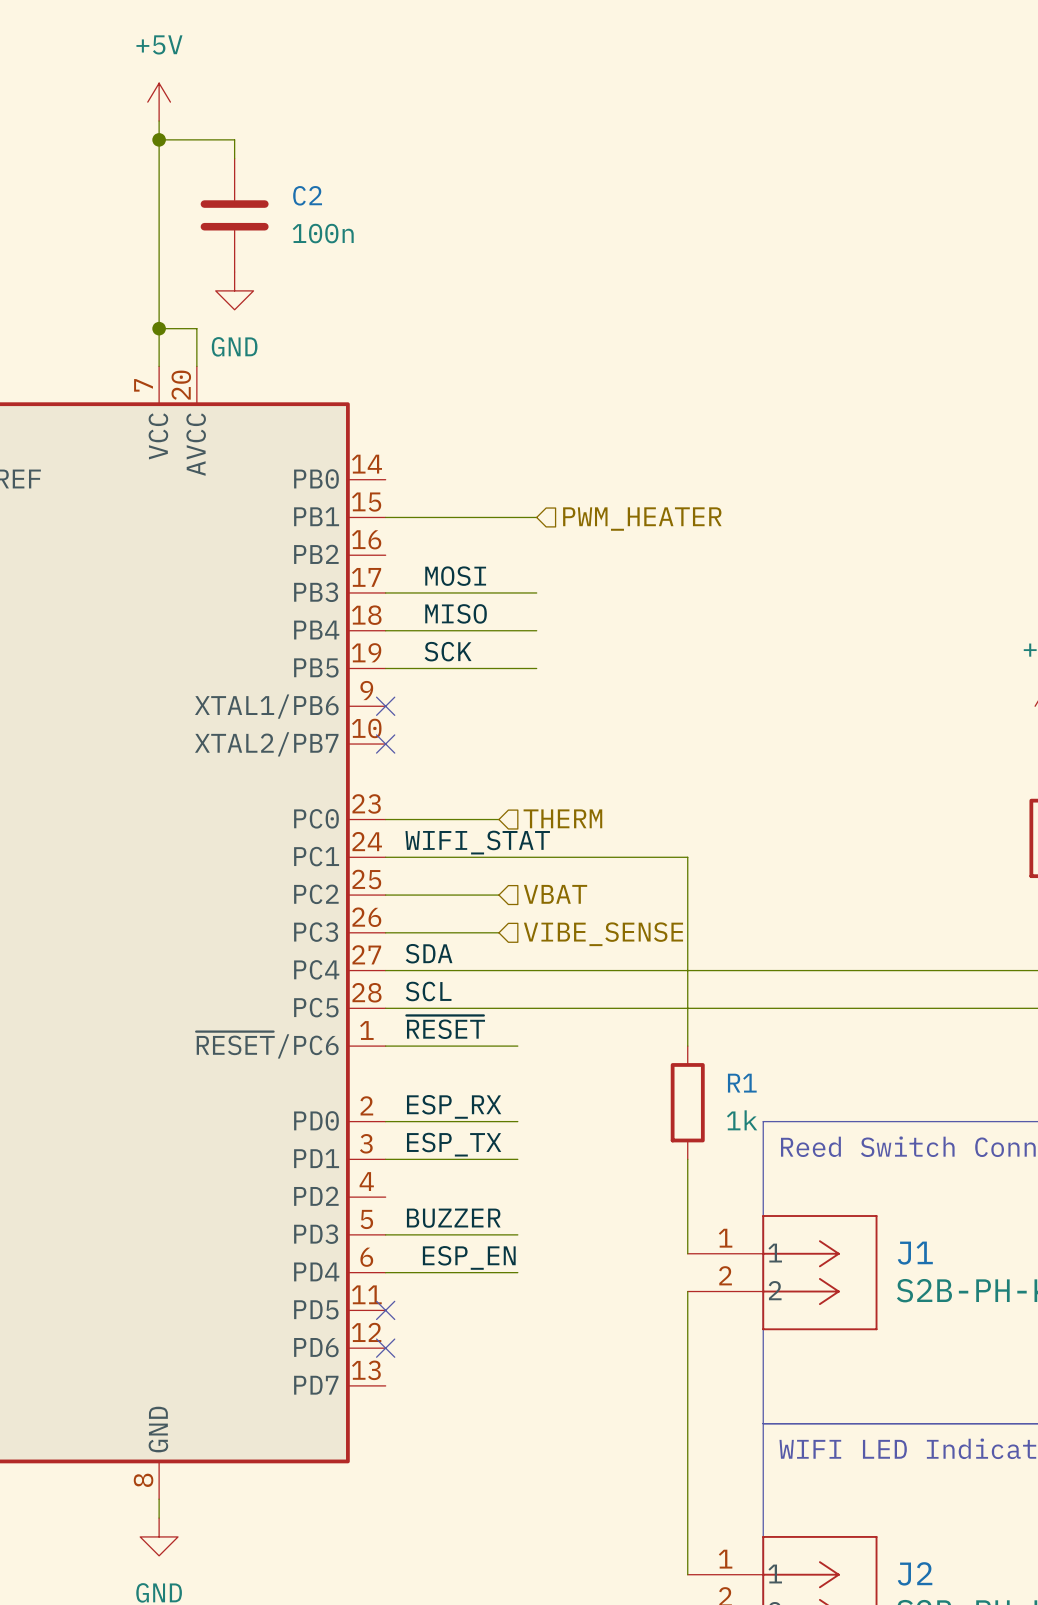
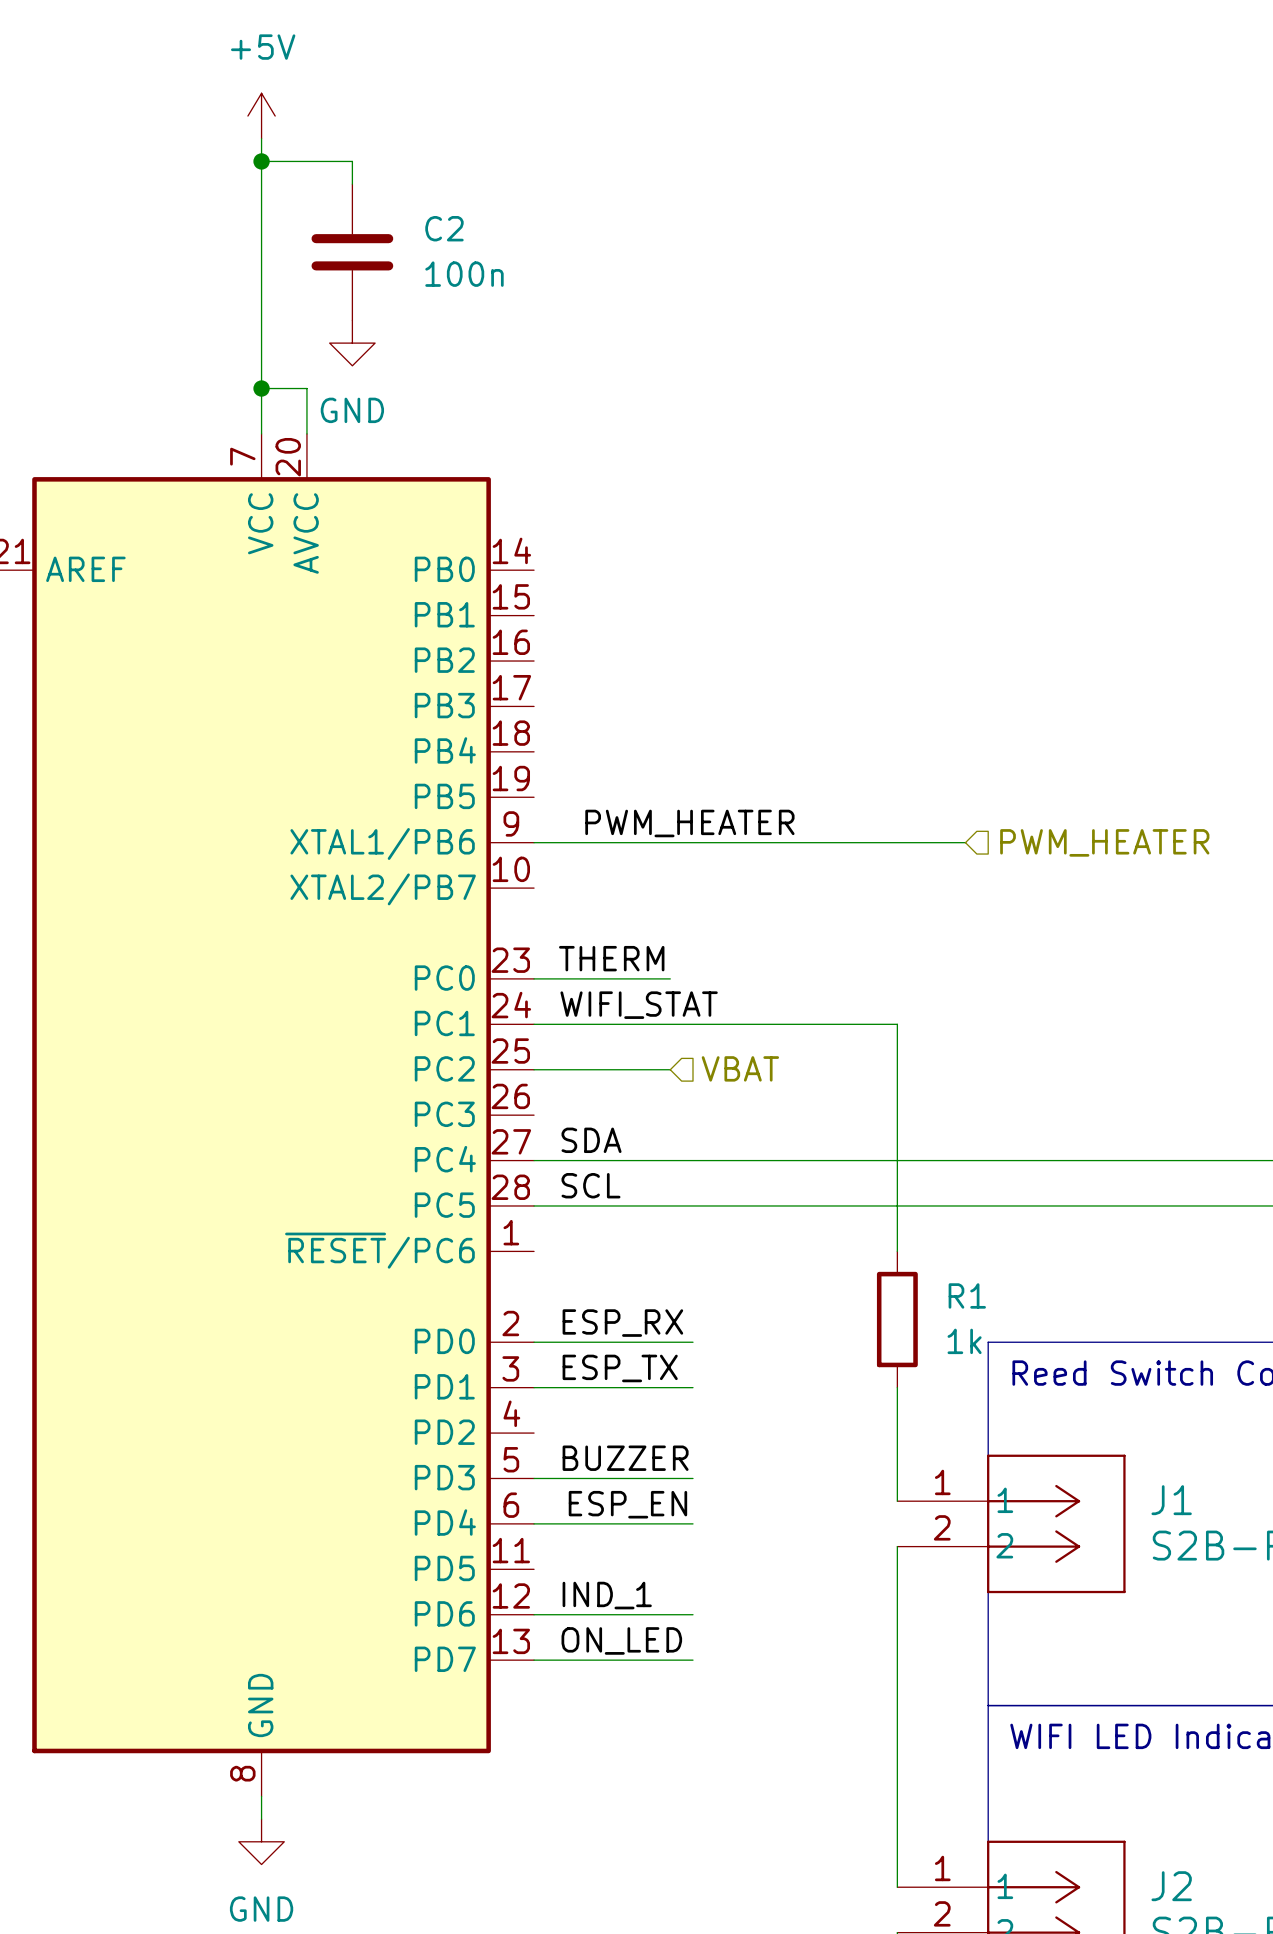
wire: (385, 517) (536, 517) -> none
hierarchical label position: PWM_HEATER (642, 519) -> PWM_HEATER (1104, 842)
label: MOSI (455, 576) -> none
wire: (385, 592) (536, 592) -> none
label: MISO (456, 613) -> none
wire: (385, 630) (536, 630) -> none
label: SCK (448, 651) -> none
wire: (385, 668) (536, 668) -> none
label: none -> PWM_HEATER (689, 823)
wire: none -> (534, 842) (965, 842)
no-connect mark: (385, 706) -> none
no-connect mark: (385, 744) -> none
label: none -> THERM (611, 958)
hierarchical label: THERM (562, 818) -> none
wire: (385, 932) (498, 932) -> none
hierarchical label: VIBE_SENSE (603, 934) -> none
label: ~{RESET} (445, 1027) -> none
wire: (385, 1046) (517, 1046) -> (534, 1614) (693, 1614)
no-connect mark: (385, 1310) -> none
label: none -> IND_1 (607, 1595)
no-connect mark: (385, 1348) -> none
label: none -> ON_LED (621, 1640)
wire: none -> (534, 1660) (693, 1660)

